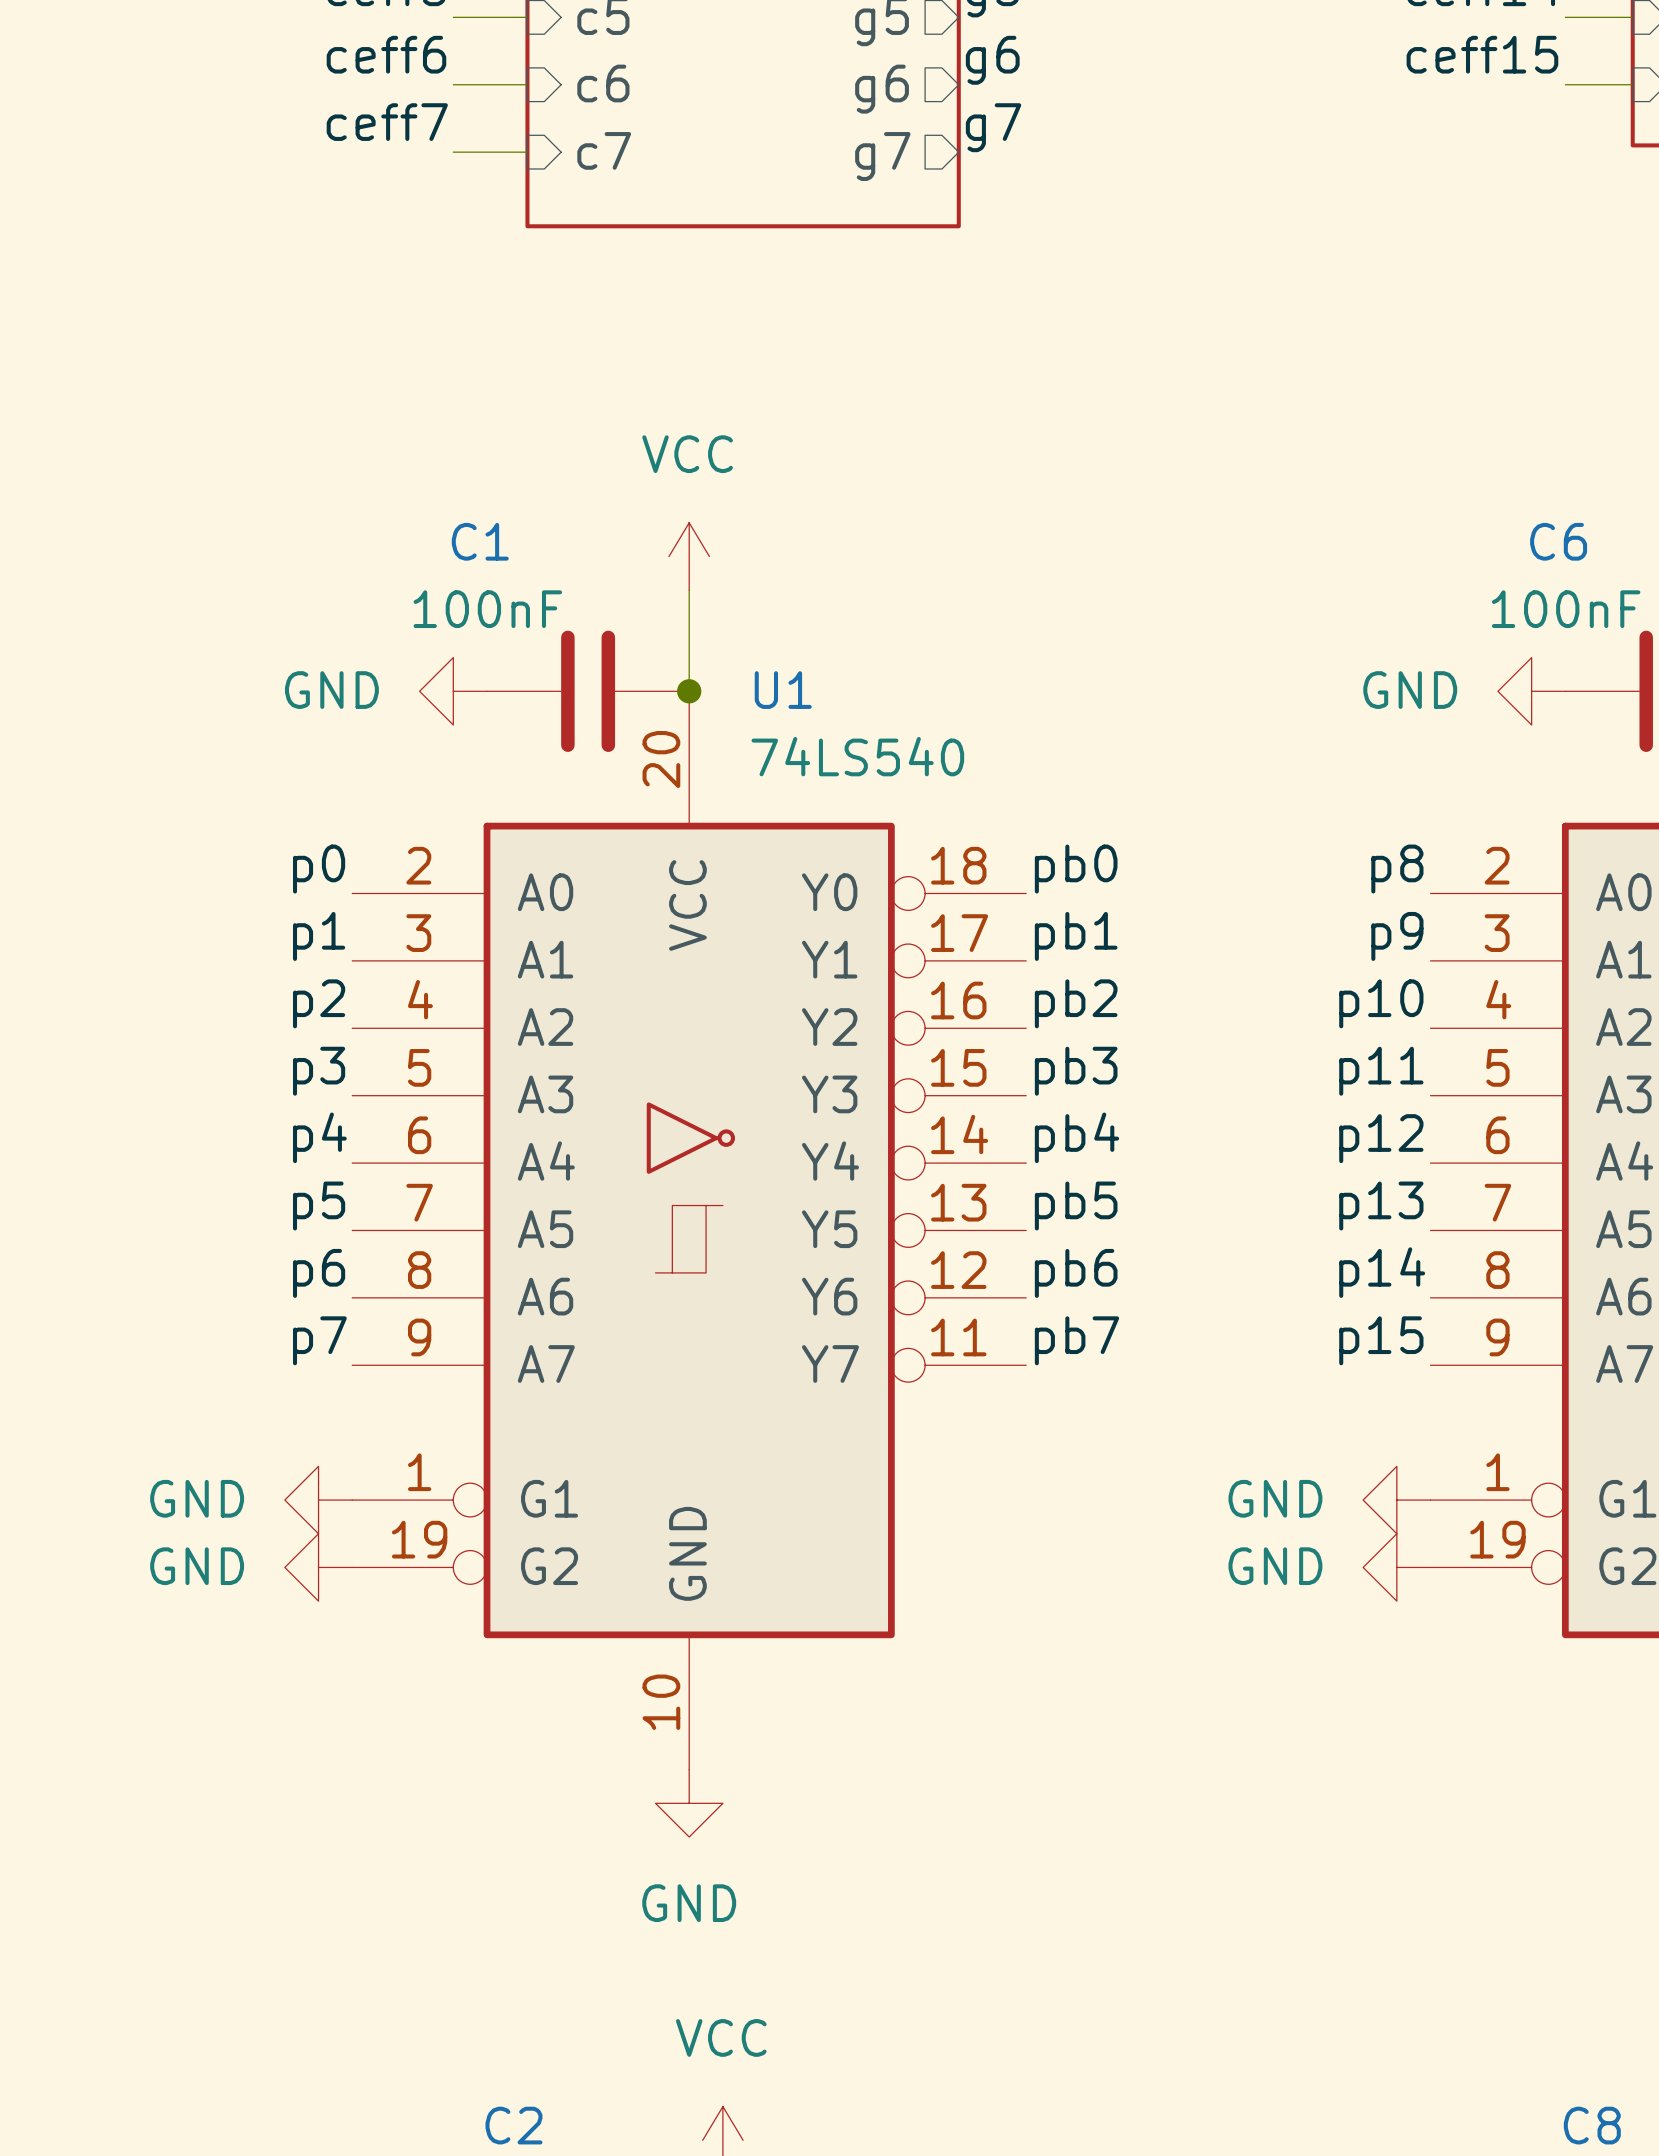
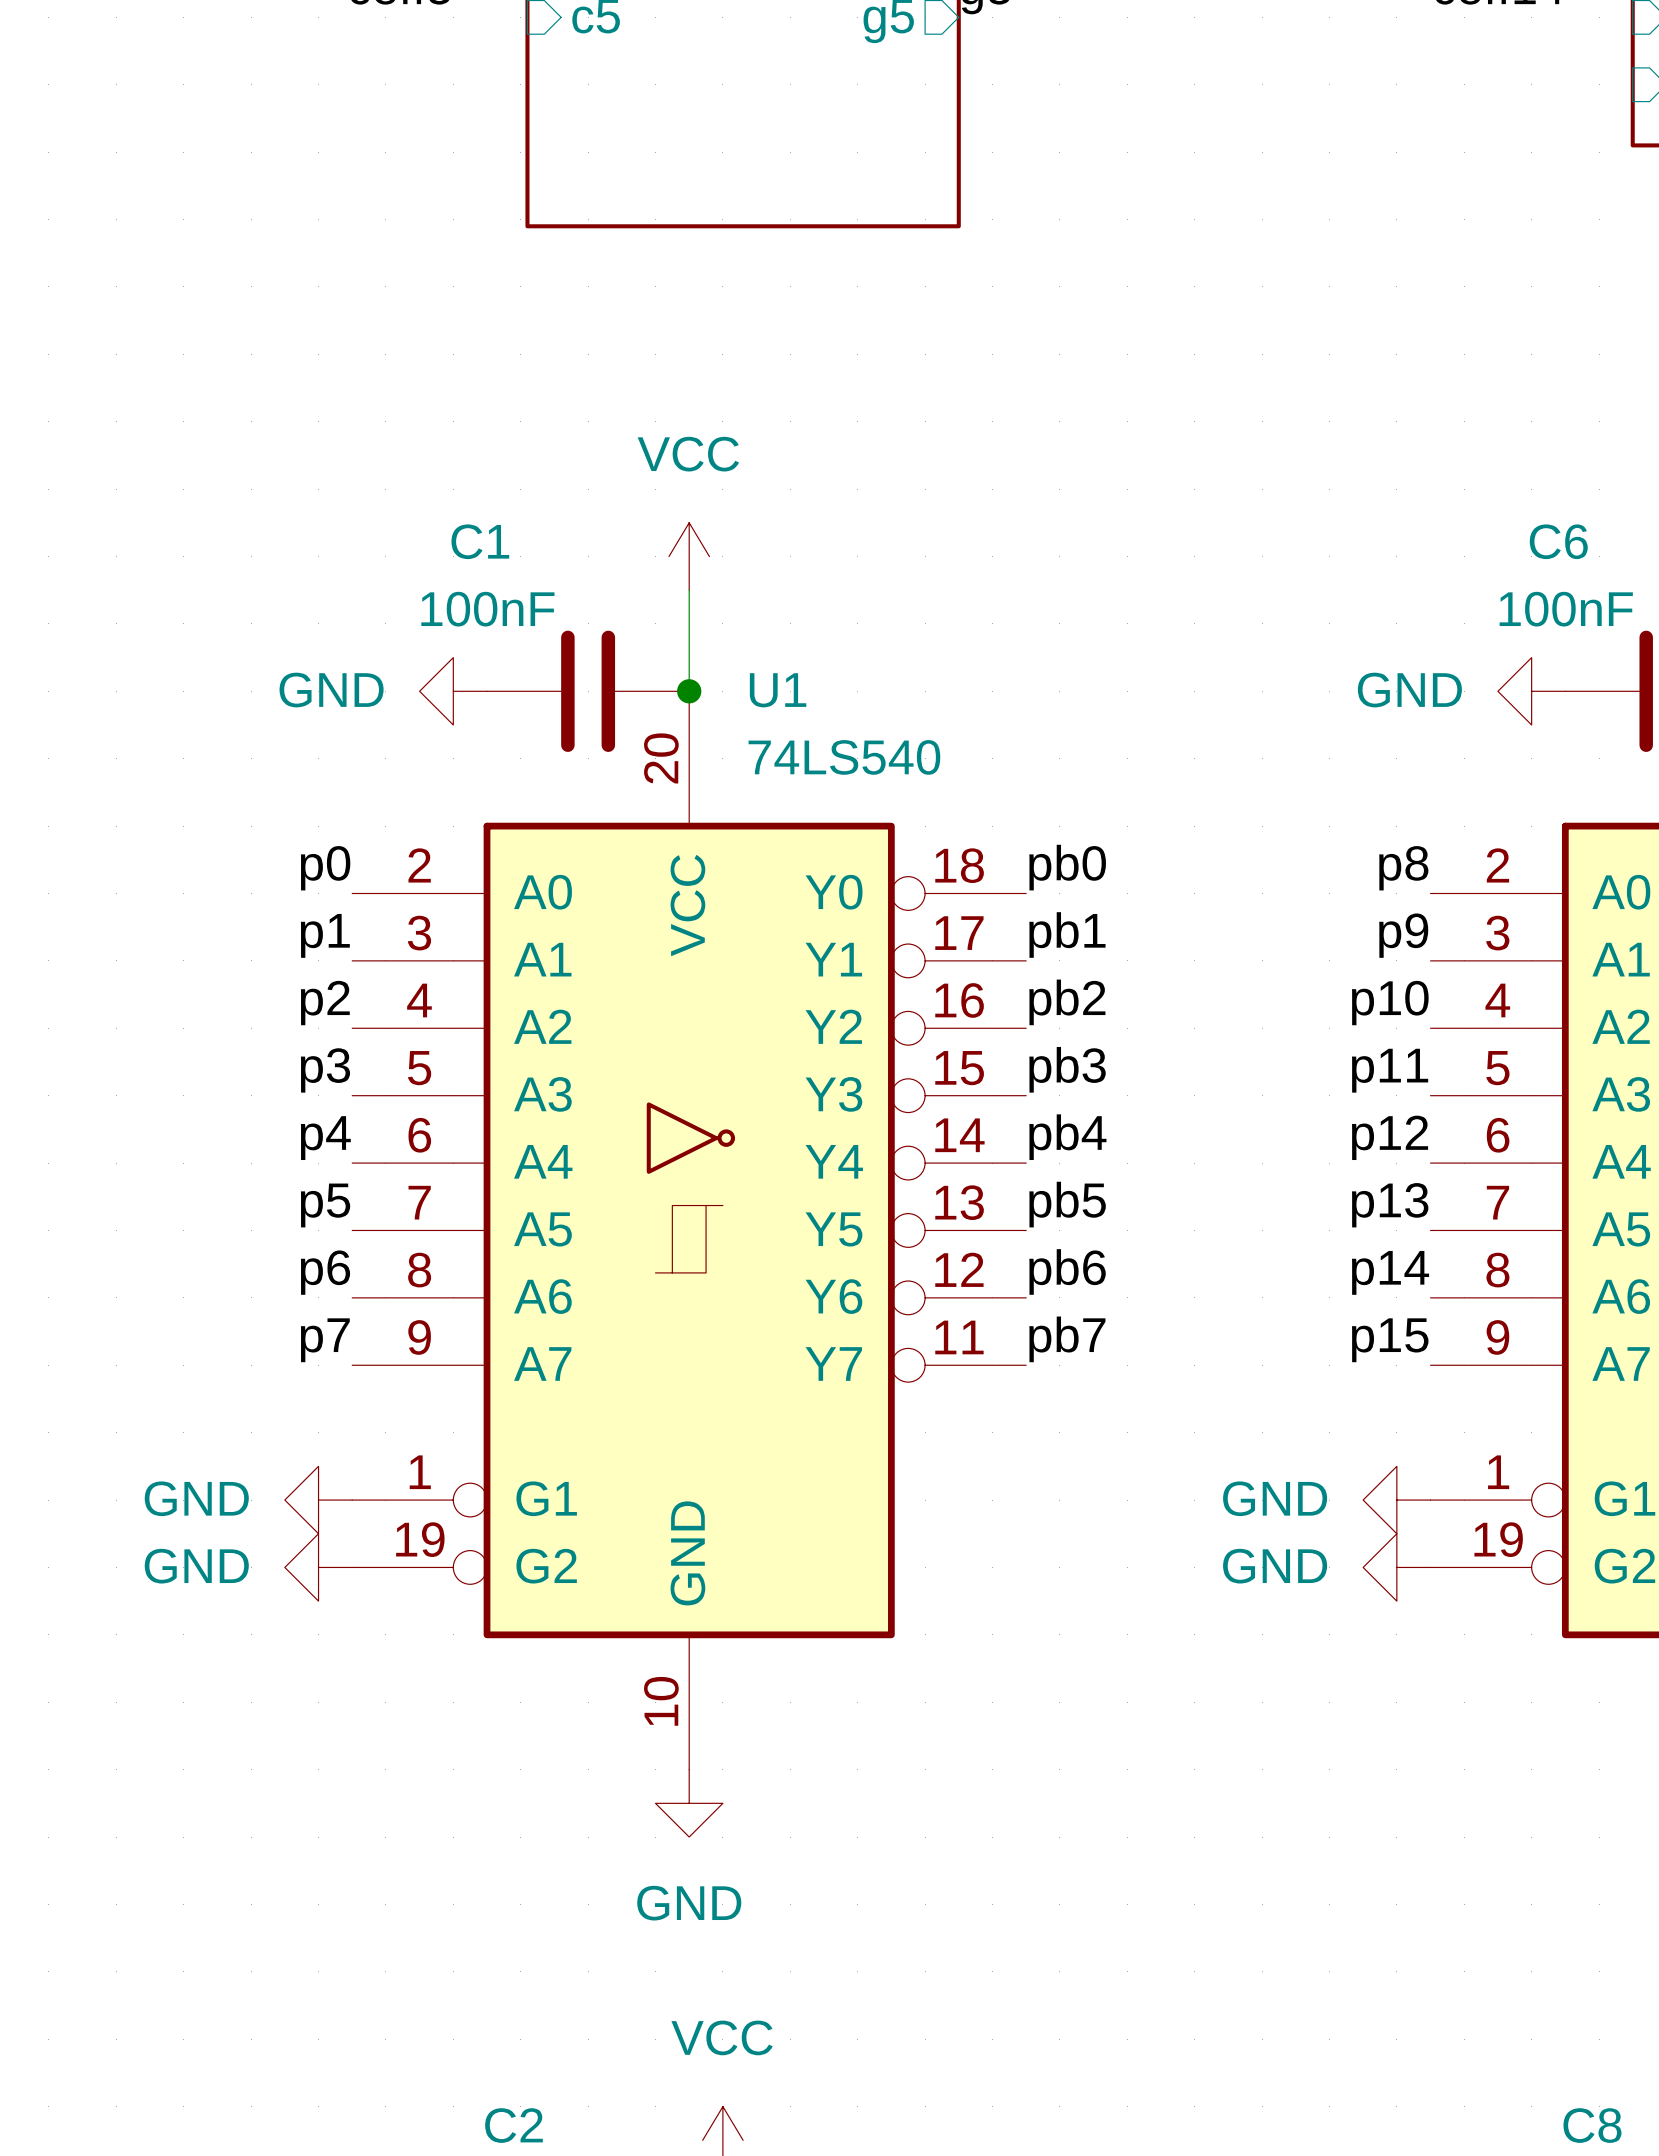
wire: (453, 17) (527, 17) -> none
wire: (1565, 17) (1632, 17) -> none
label: ceff6 (386, 54) -> none
label: ceff15 (1482, 54) -> none
label: g6 (992, 60) -> none
sheet pin: c6 (603, 83) -> none
wire: (453, 84) (527, 84) -> none
wire: (1565, 84) (1632, 84) -> none
sheet pin: g6 (882, 89) -> none
label: ceff7 (387, 122) -> none
label: g7 (993, 127) -> none
sheet pin: c7 (604, 150) -> none
wire: (453, 152) (527, 152) -> none
sheet pin: g7 (882, 156) -> none

